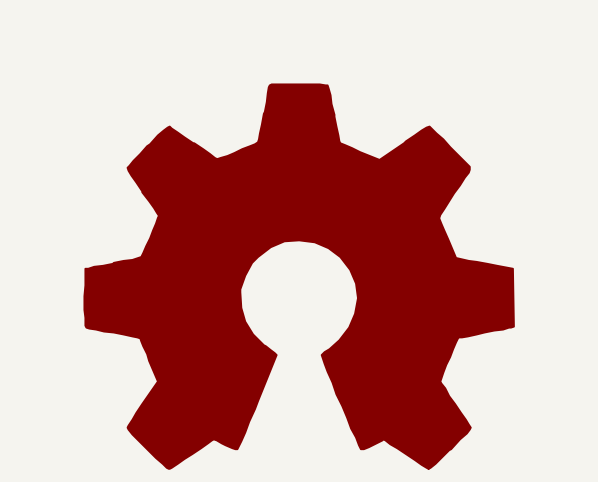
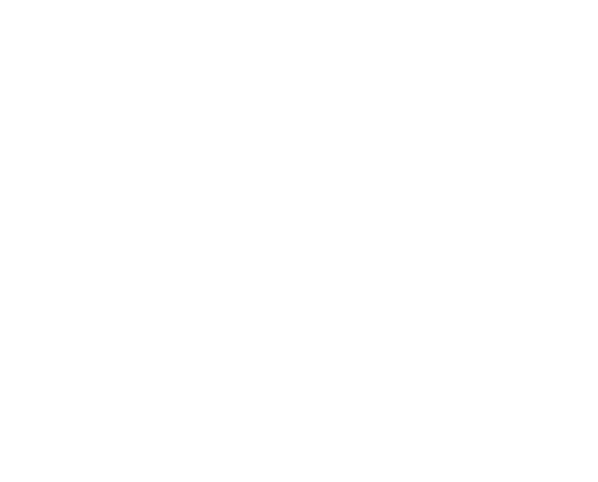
part: (299, 276) -> none

